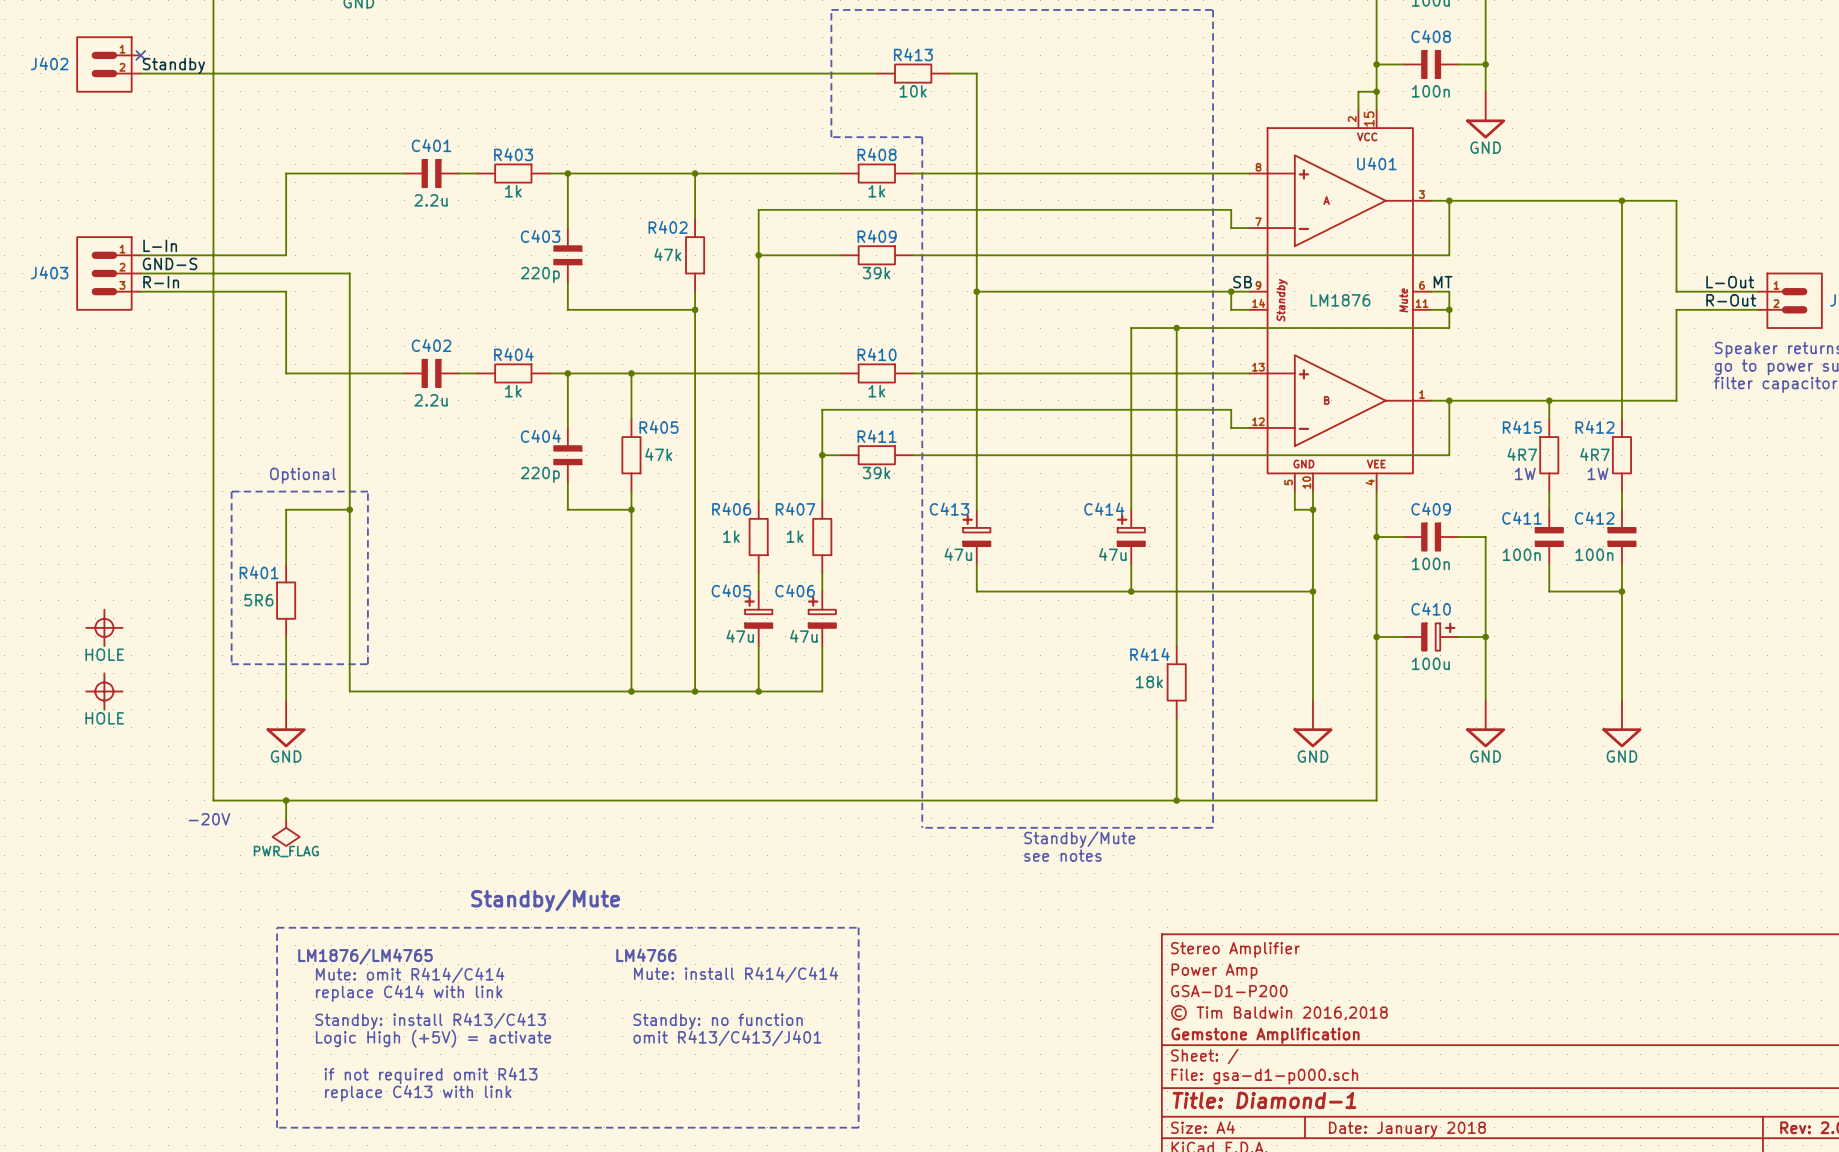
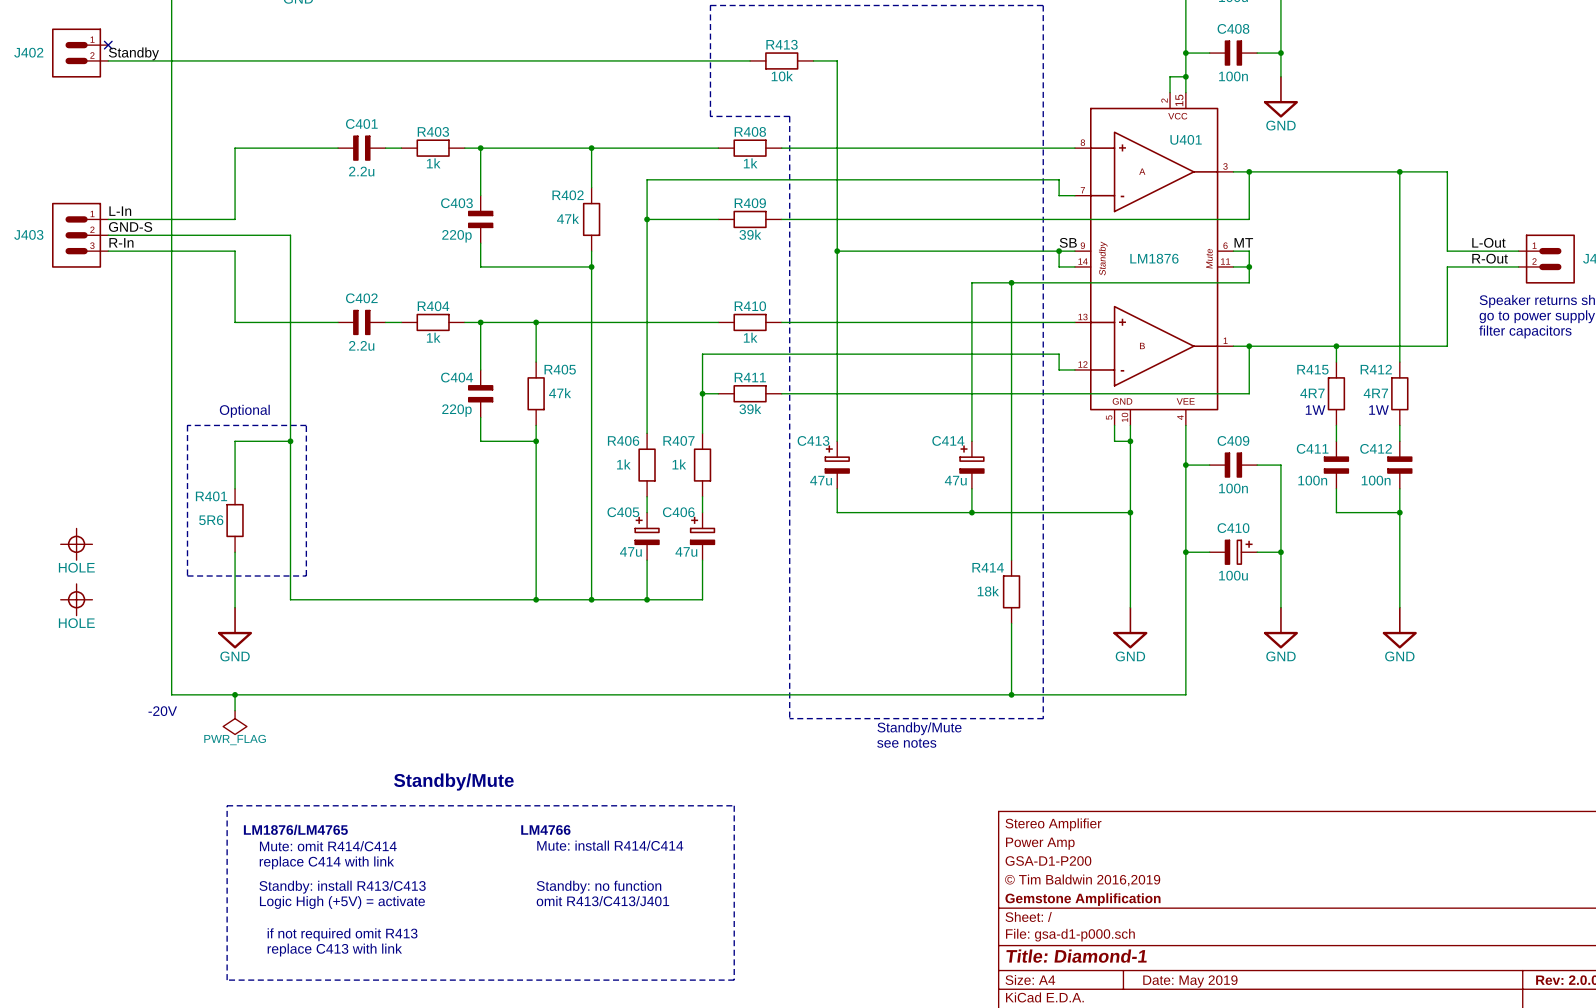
title block: © Tim Baldwin 2016,2018 (1279, 1012) -> © Tim Baldwin 2016,2019 (1082, 880)
title block: Date: January 2018 (1407, 1129) -> Date: May 2019 (1190, 981)

